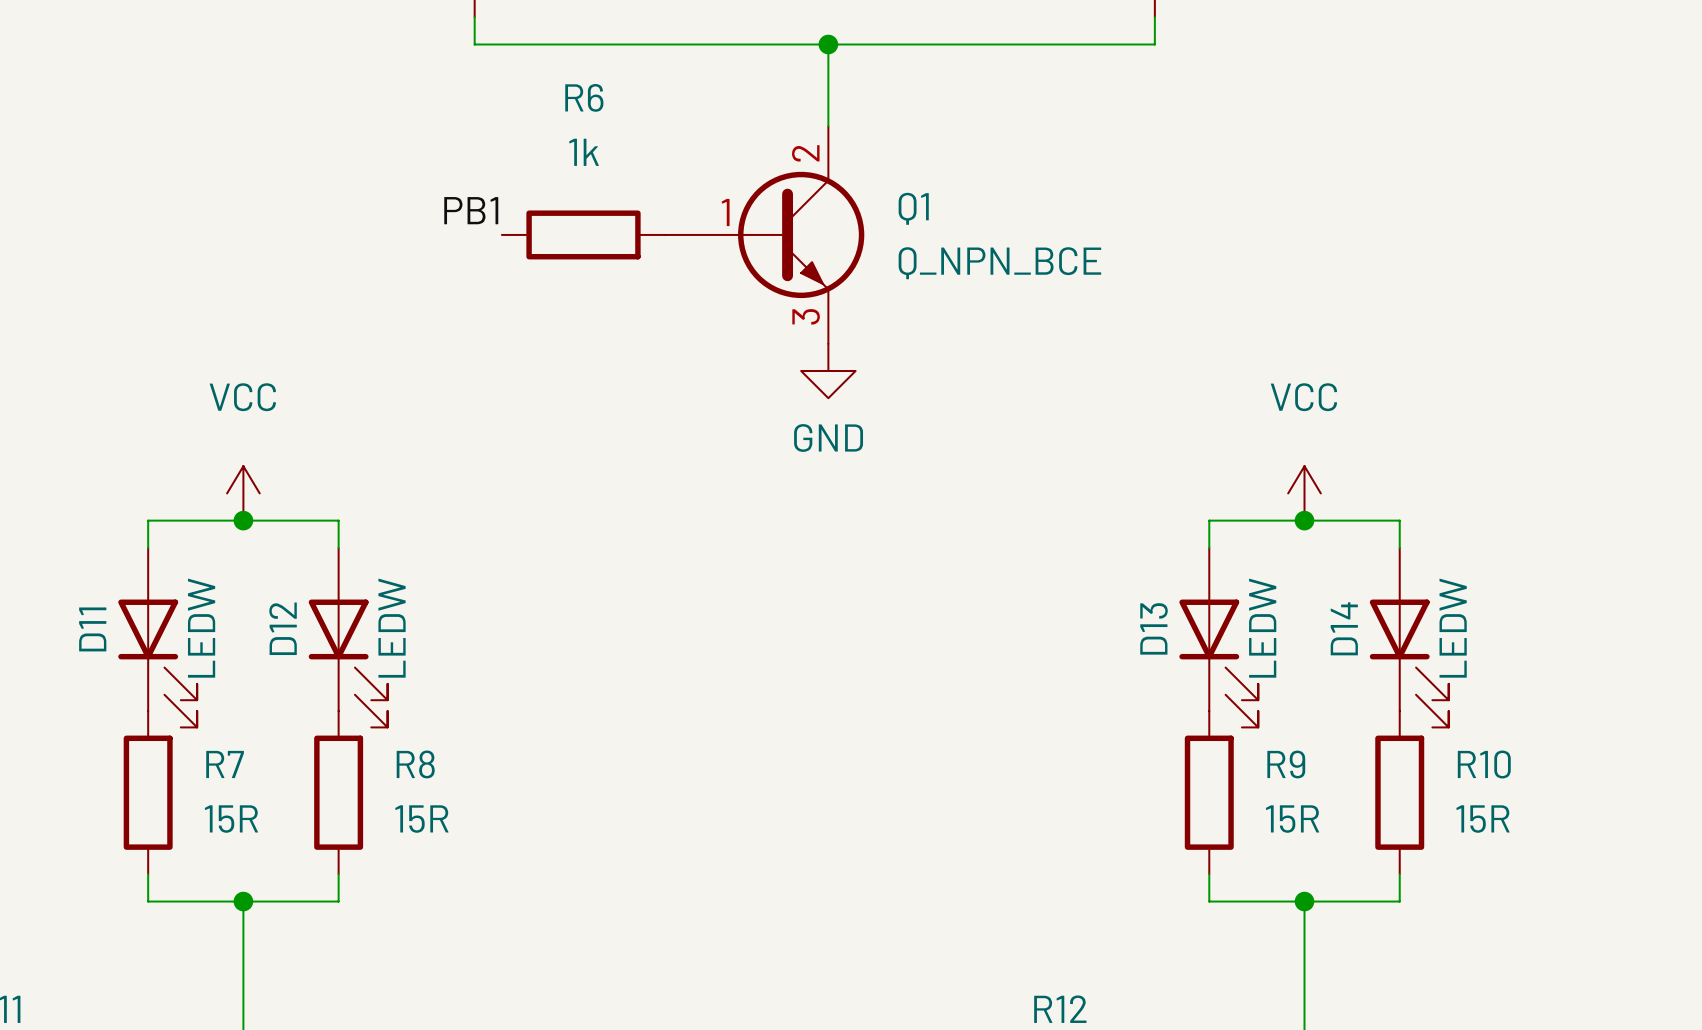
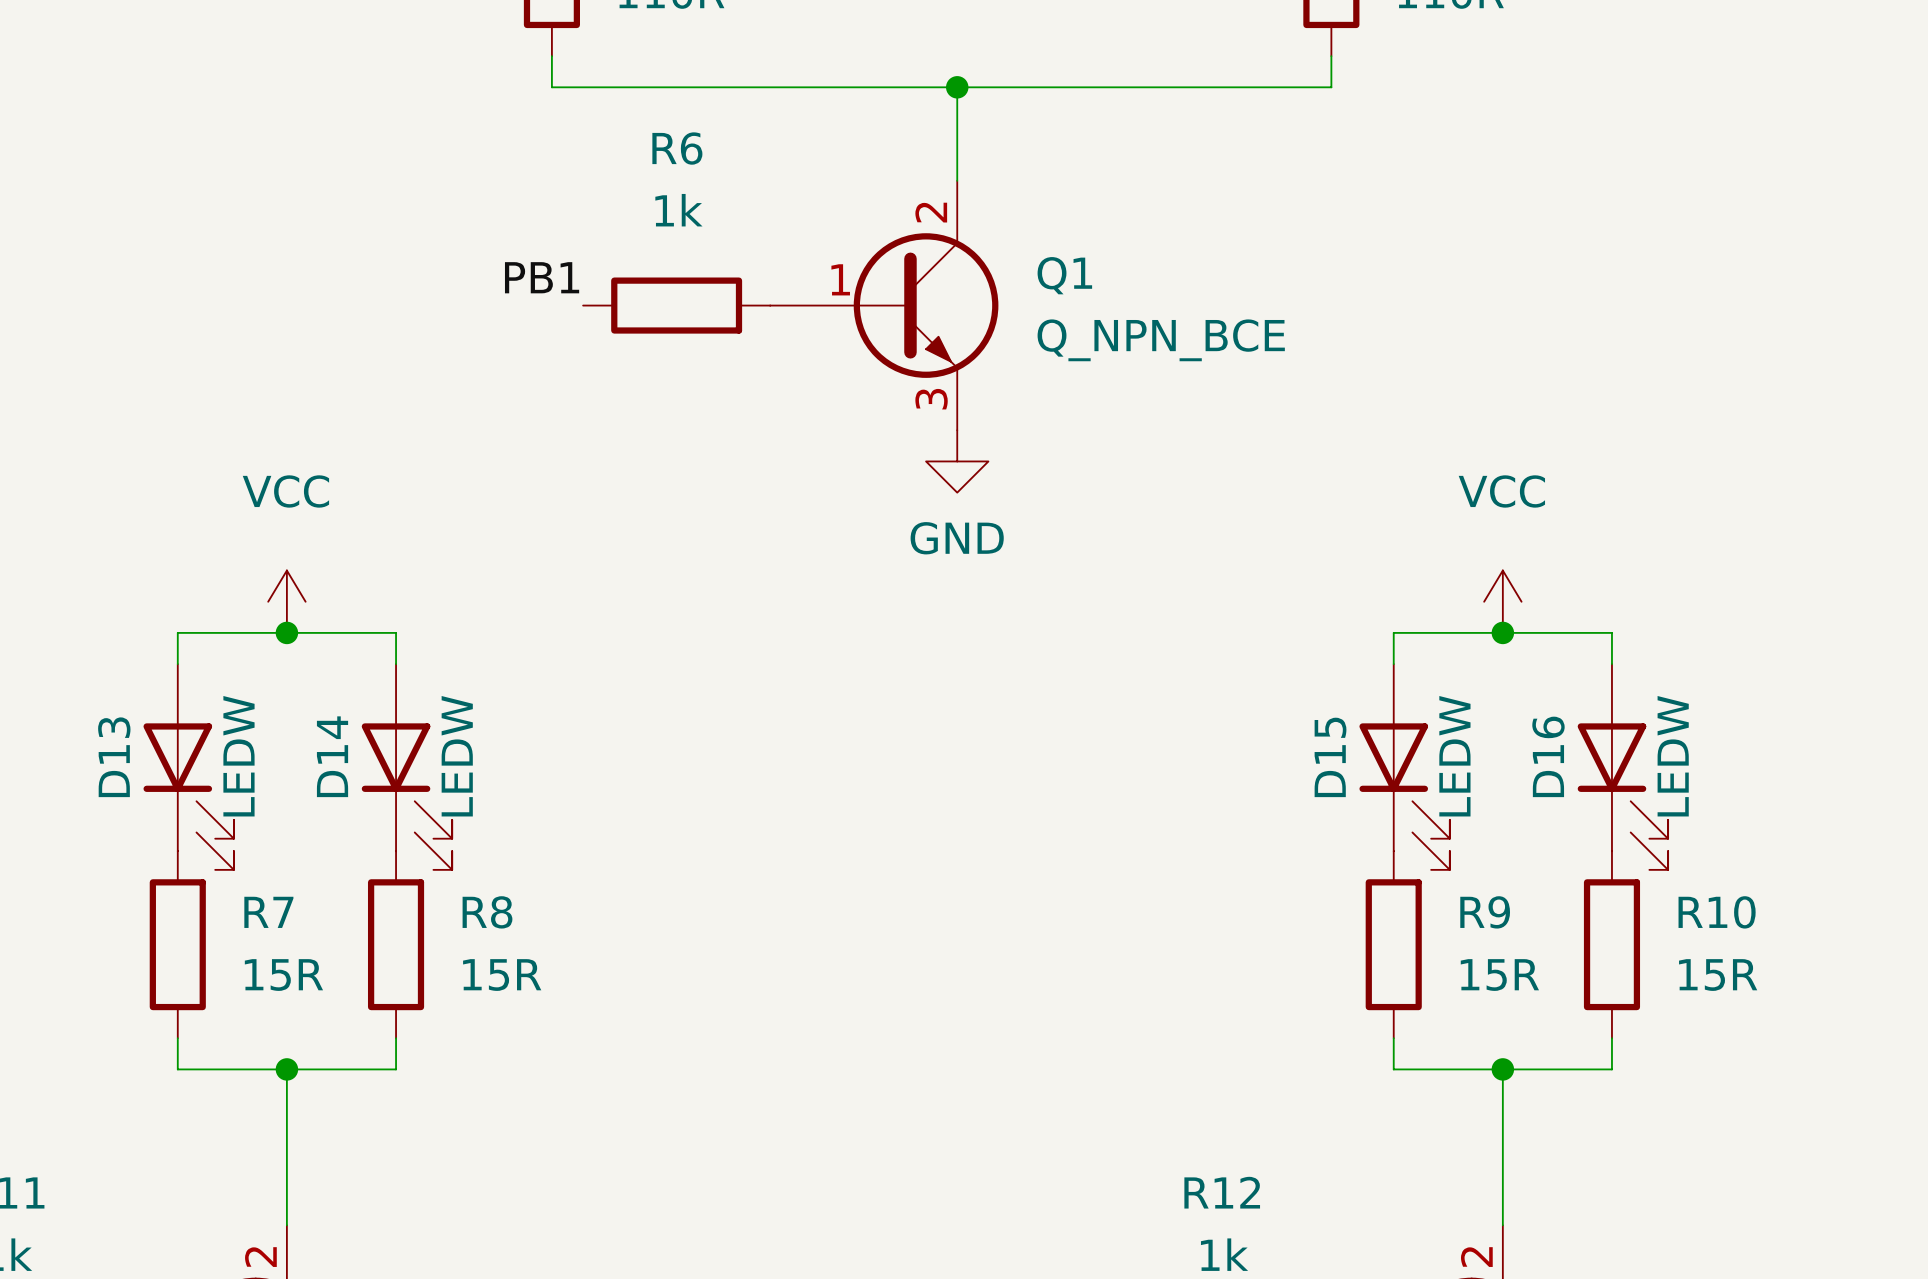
D12 name: D12 (283, 628) -> D14 (332, 756)
D13 name: D13 (1154, 628) -> D15 (1330, 757)
D14 name: D14 (1344, 628) -> D16 (1548, 756)
D11 name: D11 (92, 629) -> D13 (114, 757)

